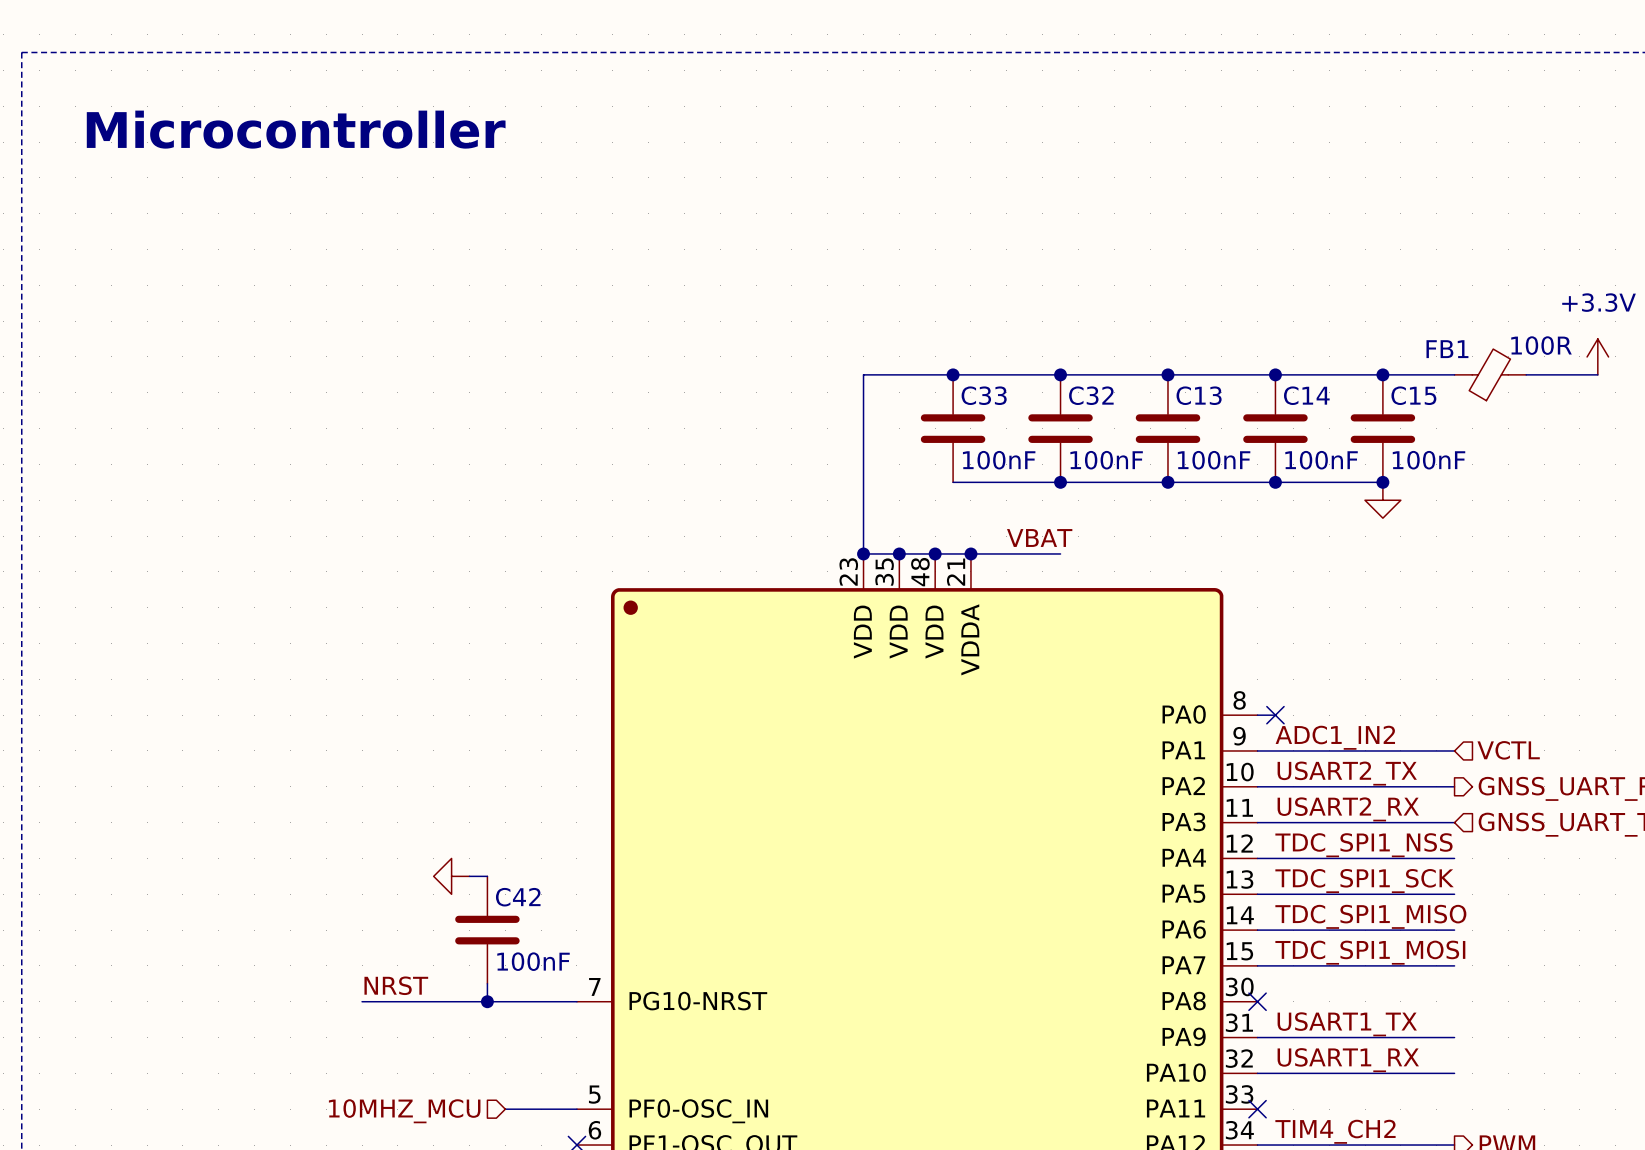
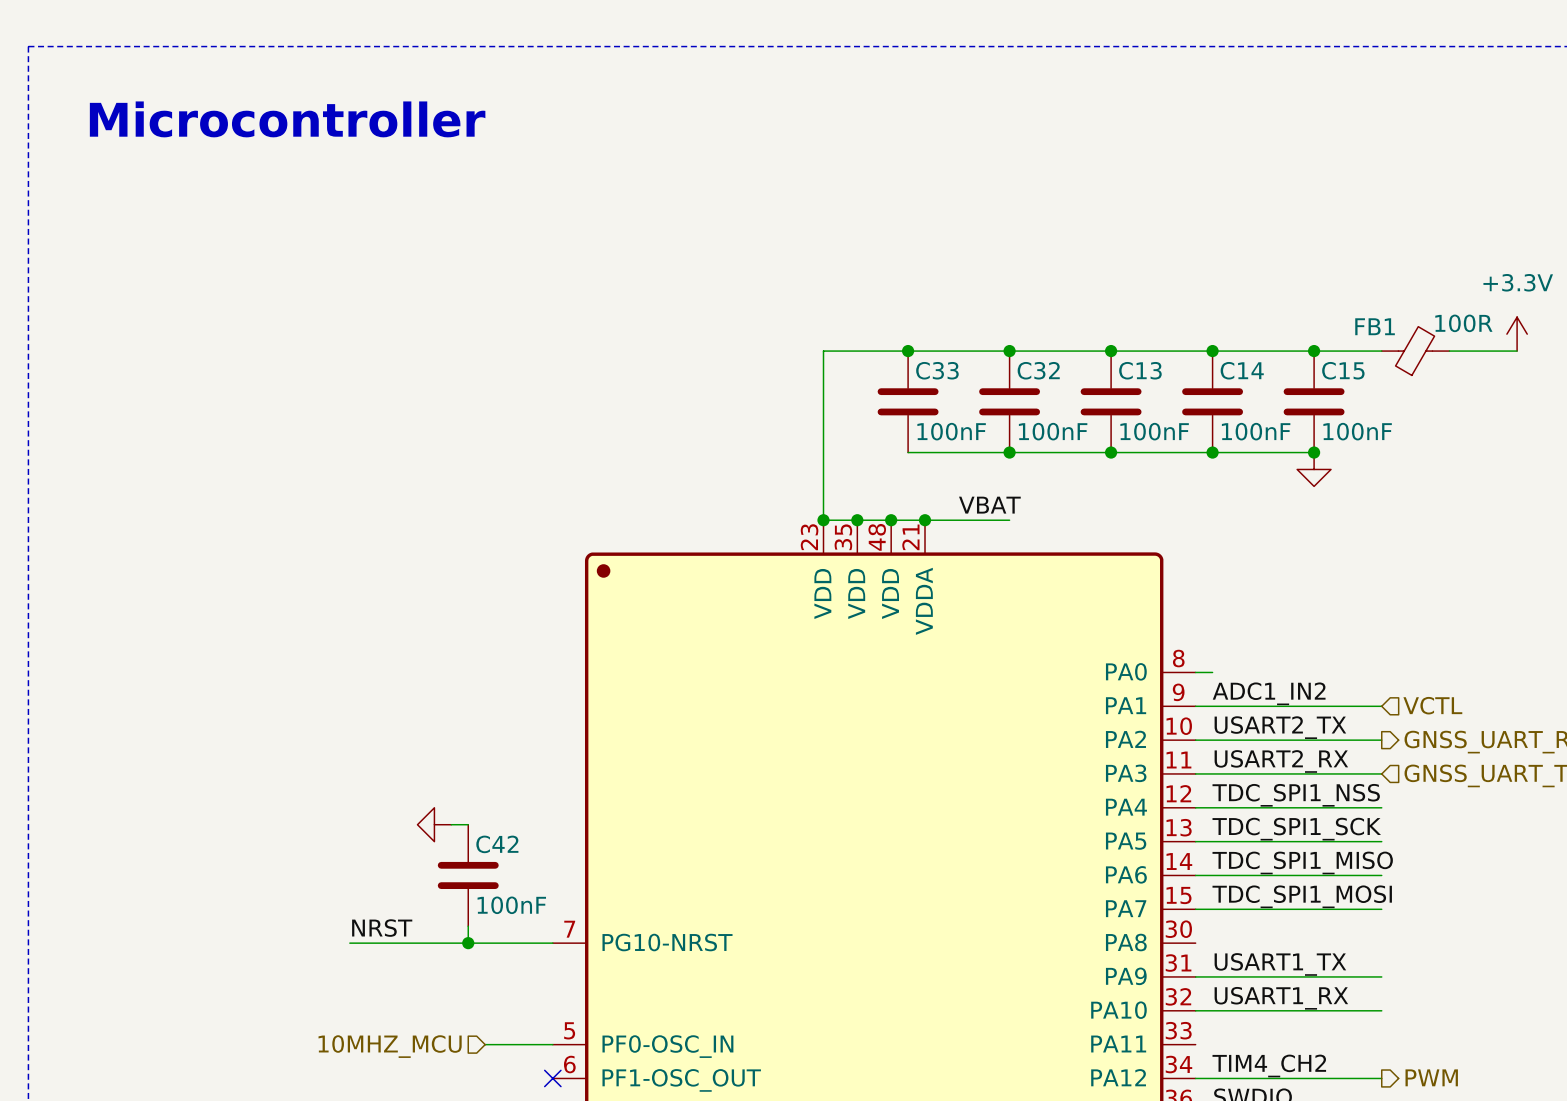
no-connect mark: (1275, 715) -> none
no-connect mark: (1257, 1001) -> none
no-connect mark: (1257, 1109) -> none

